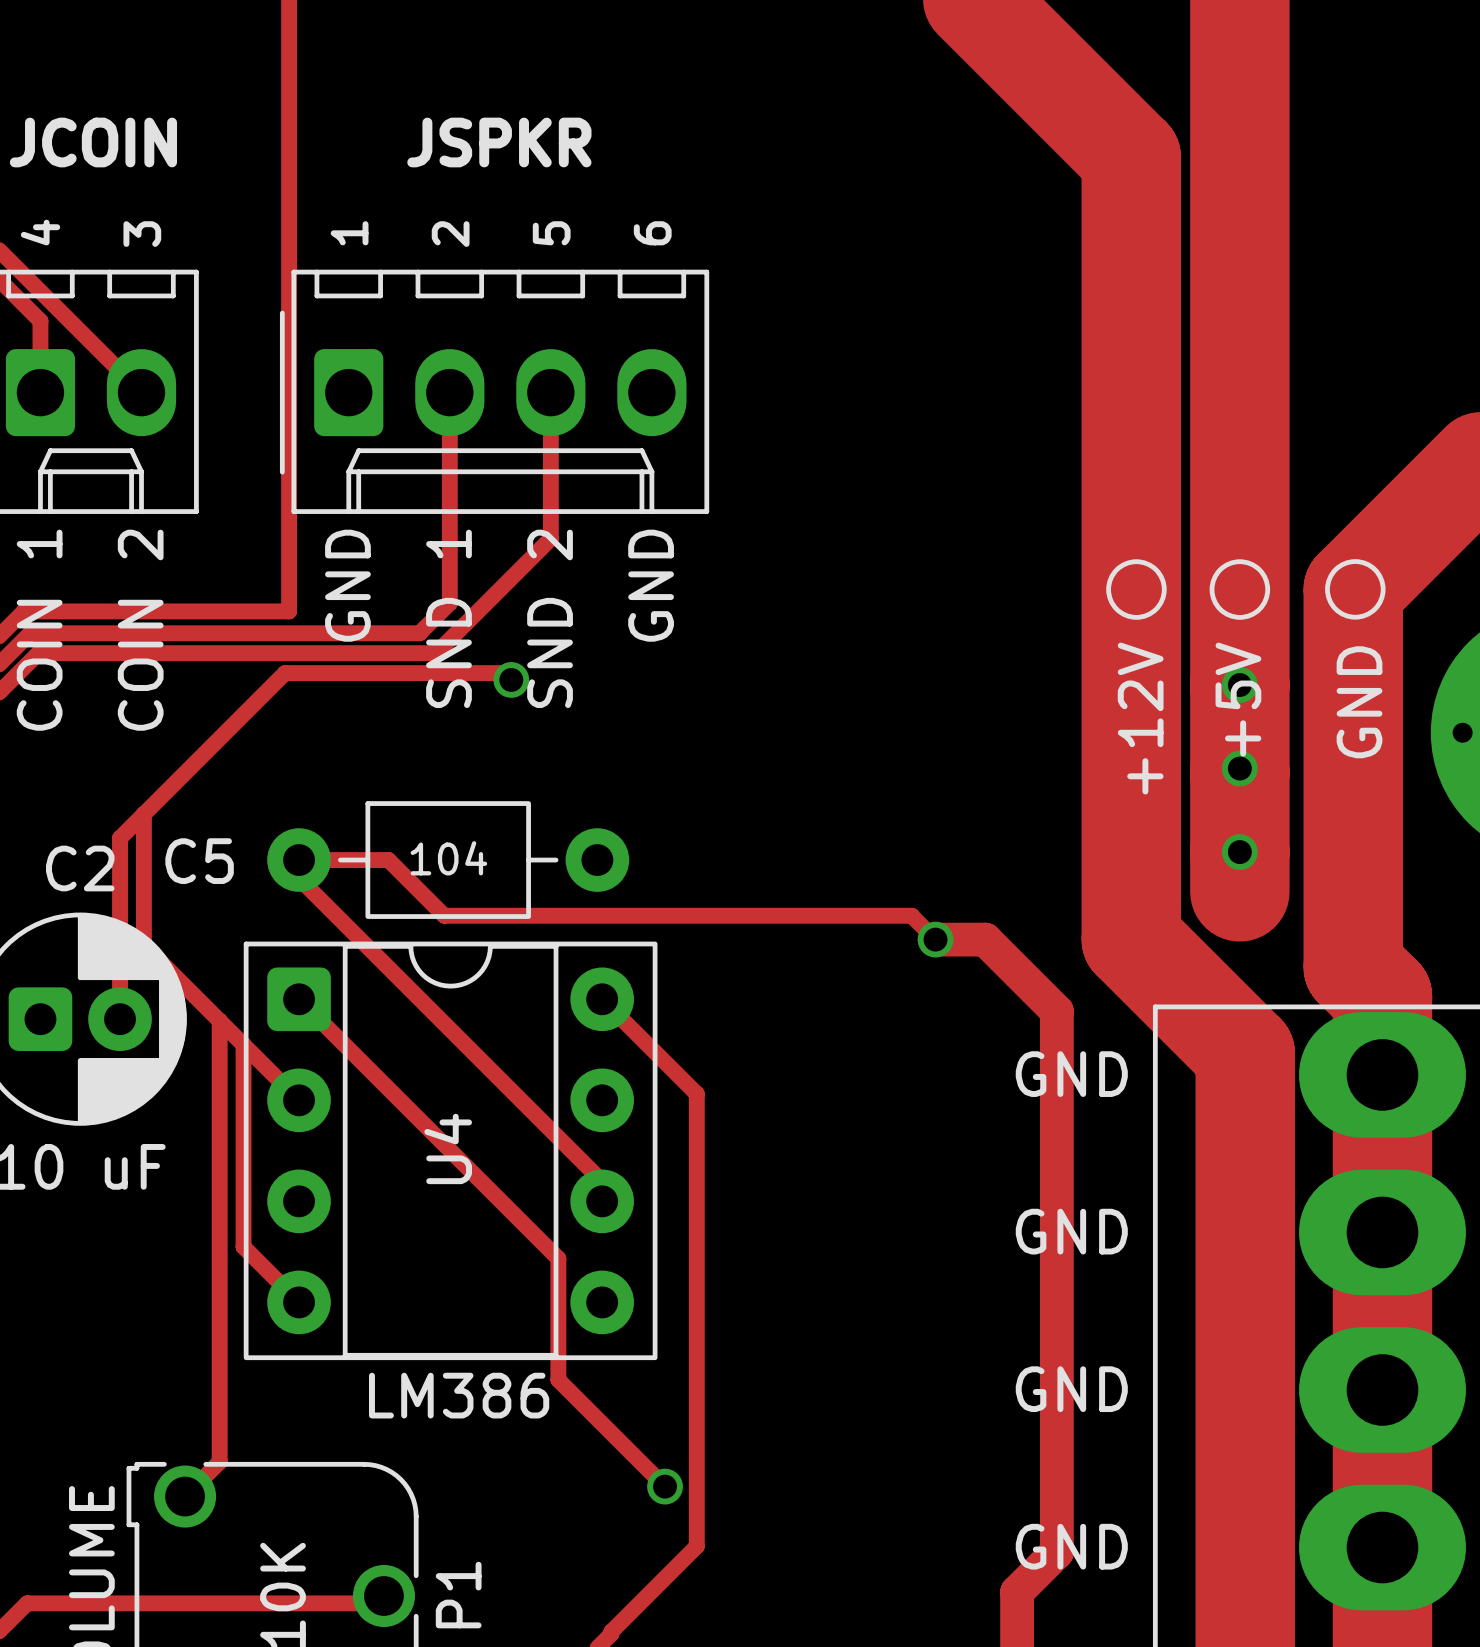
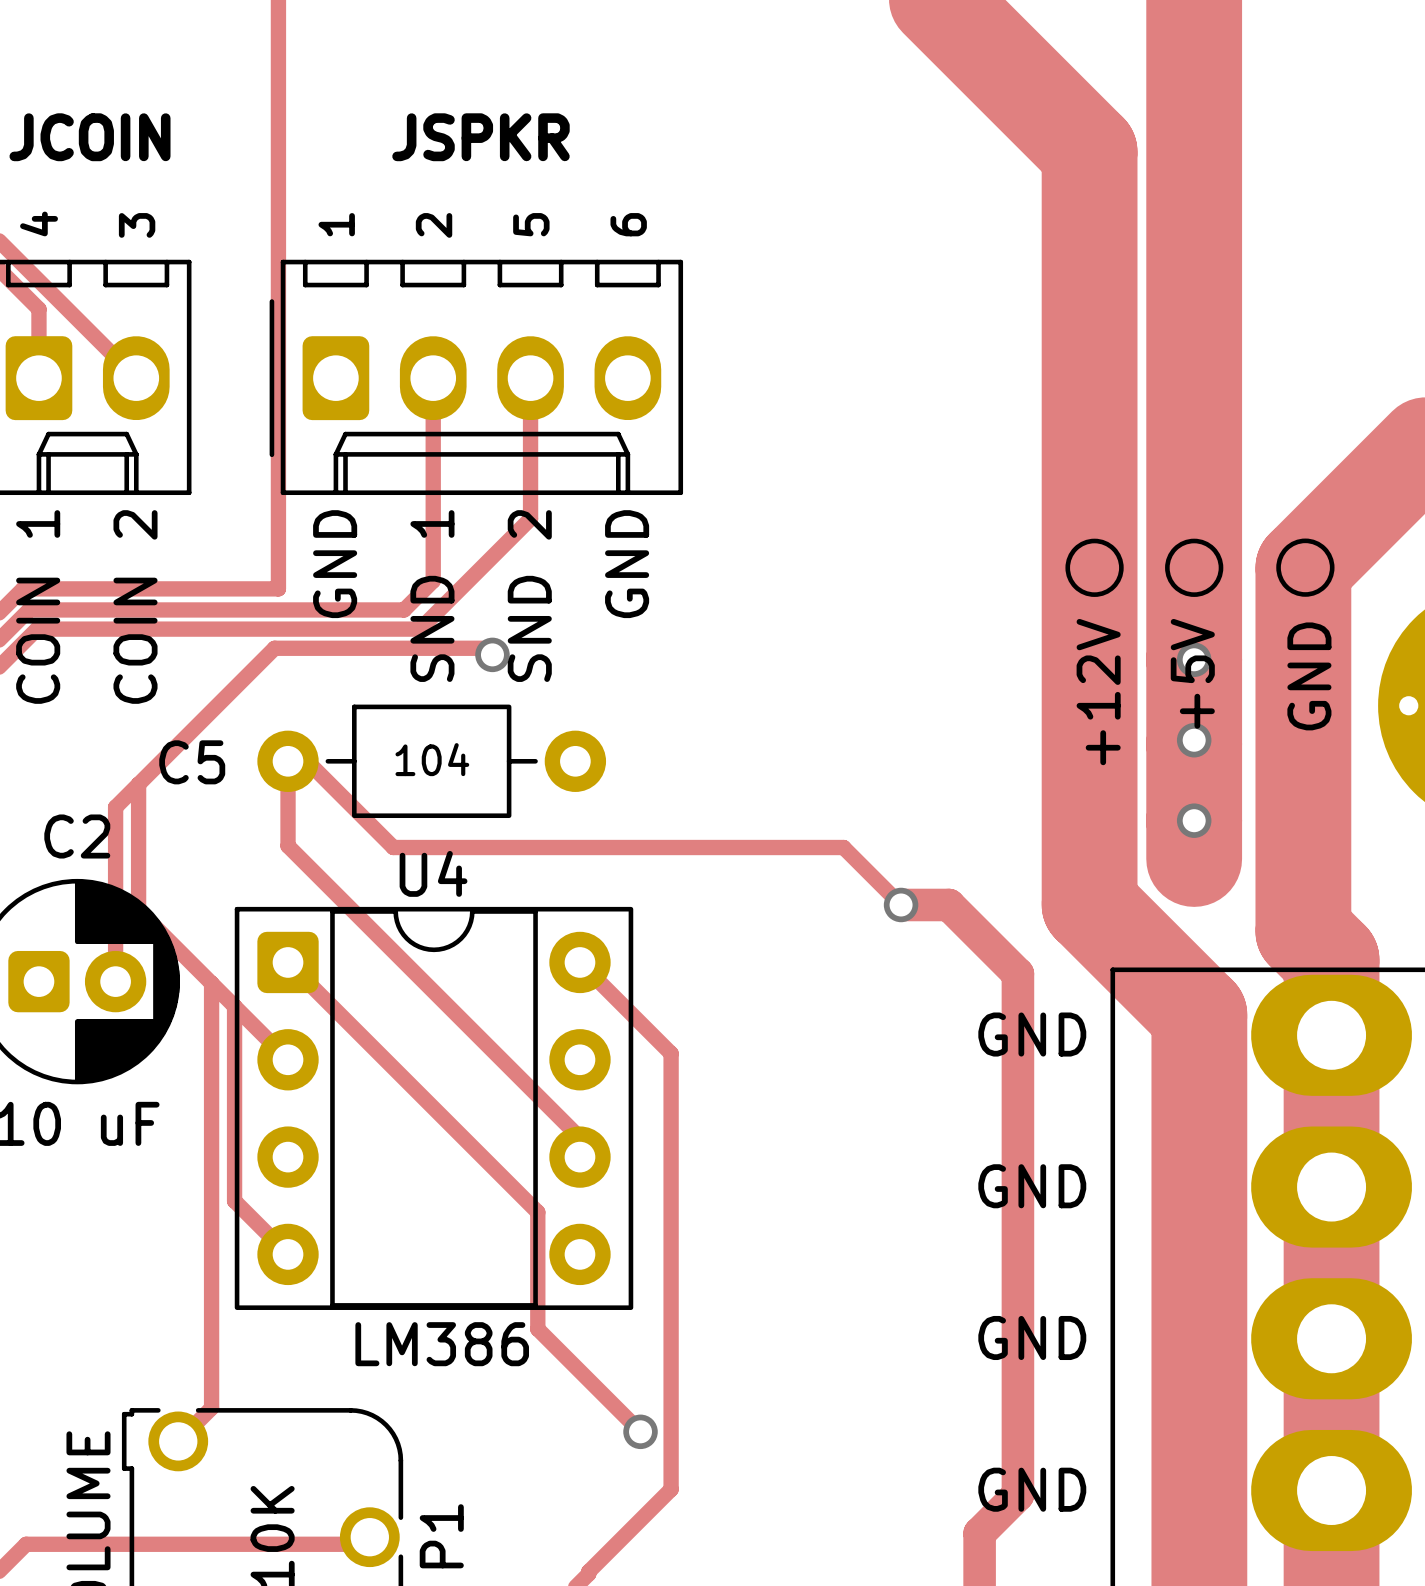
track: (299, 860) (388, 860) -> (288, 828) (288, 761) (307, 761) (374, 828)
C5 position: (448, 860) -> (431, 761)
track: (408, 879) (444, 915) (911, 915) -> (393, 847) (843, 847) (878, 882)
U4 name rotation: 0° (448, 1148) -> 90° clockwise (433, 873)
U4 name position: U4 (448, 1148) -> U4 (433, 873)

